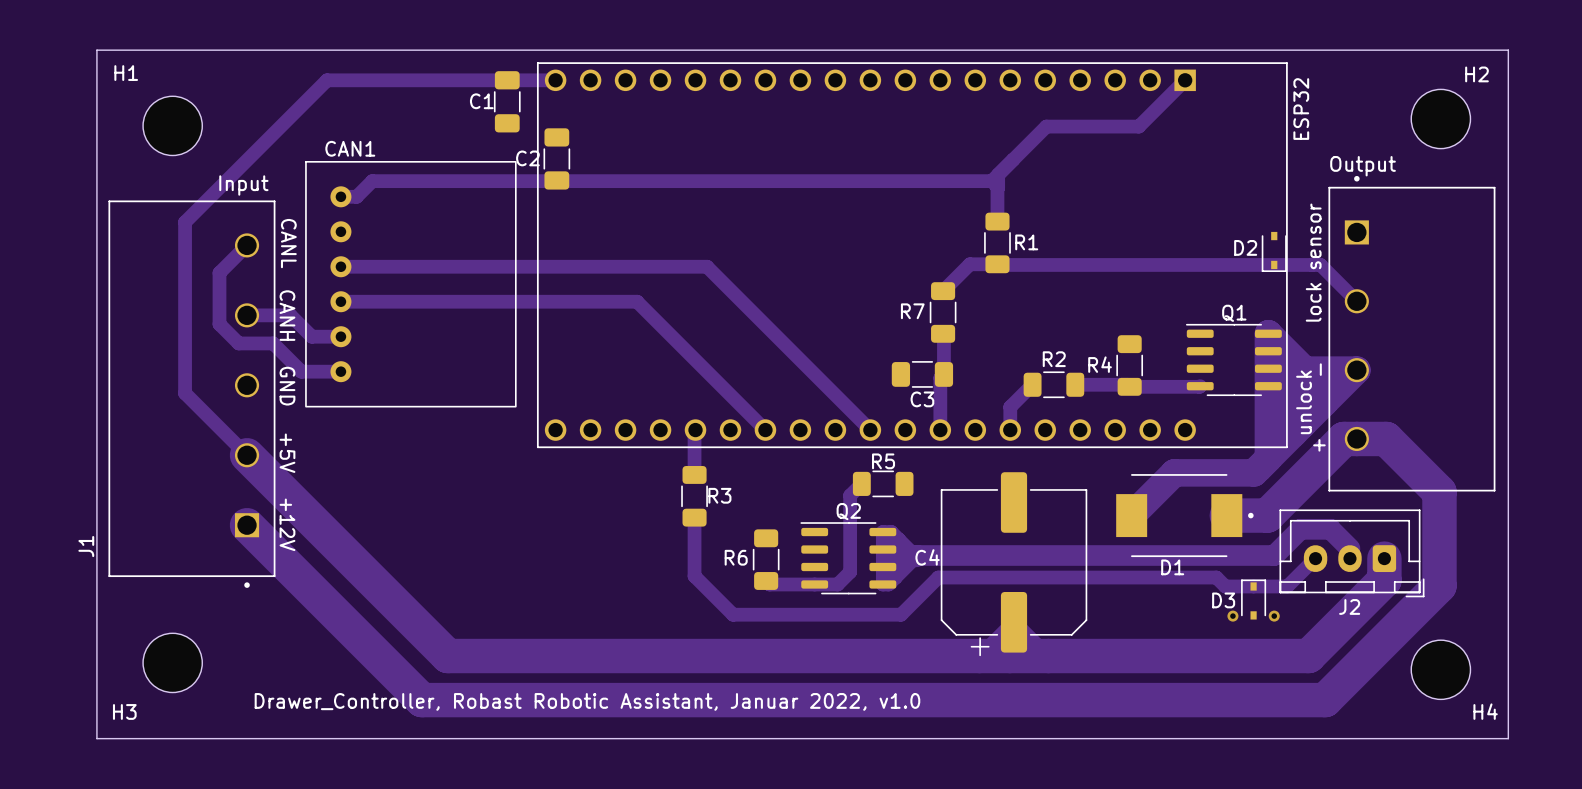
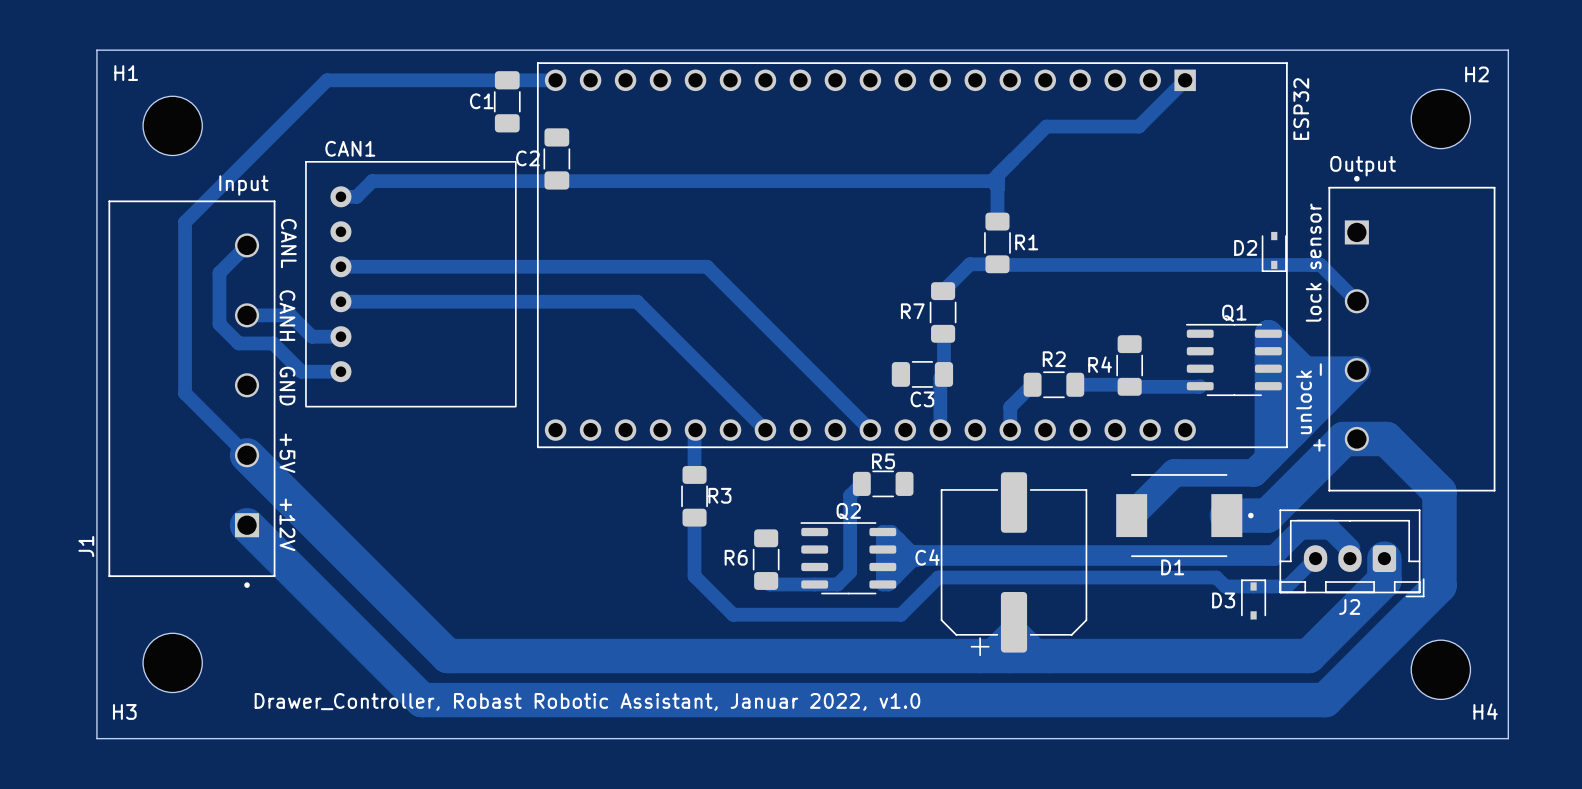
via: (1232, 616) -> none
via: (1274, 616) -> none

